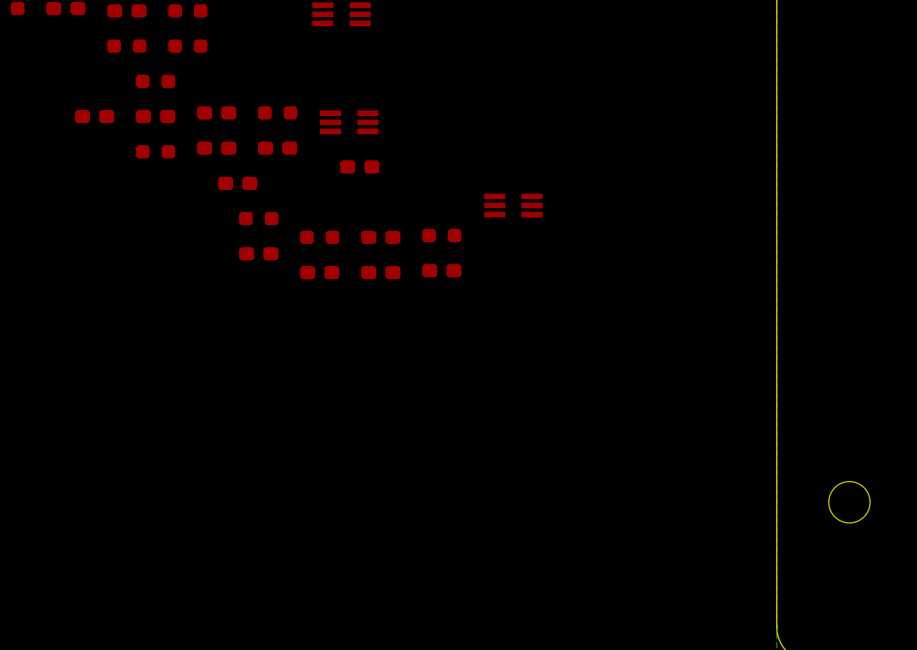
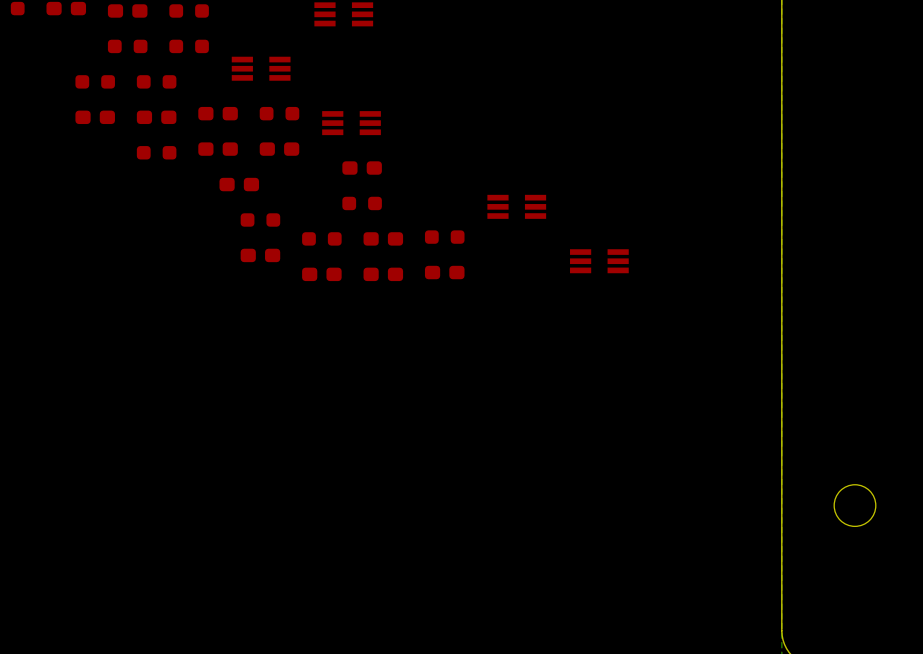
part: none -> (261, 68)
part: none -> (95, 81)
part: none -> (362, 203)
part: none -> (599, 261)

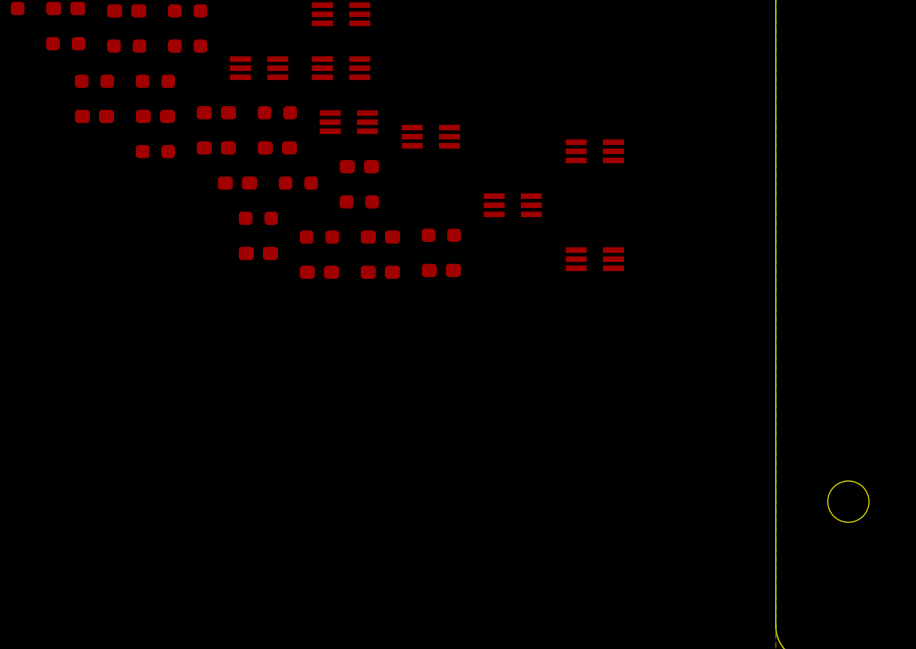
part: none -> (65, 43)
part: none -> (341, 68)
part: none -> (430, 136)
part: none -> (594, 151)
part: none -> (298, 183)

